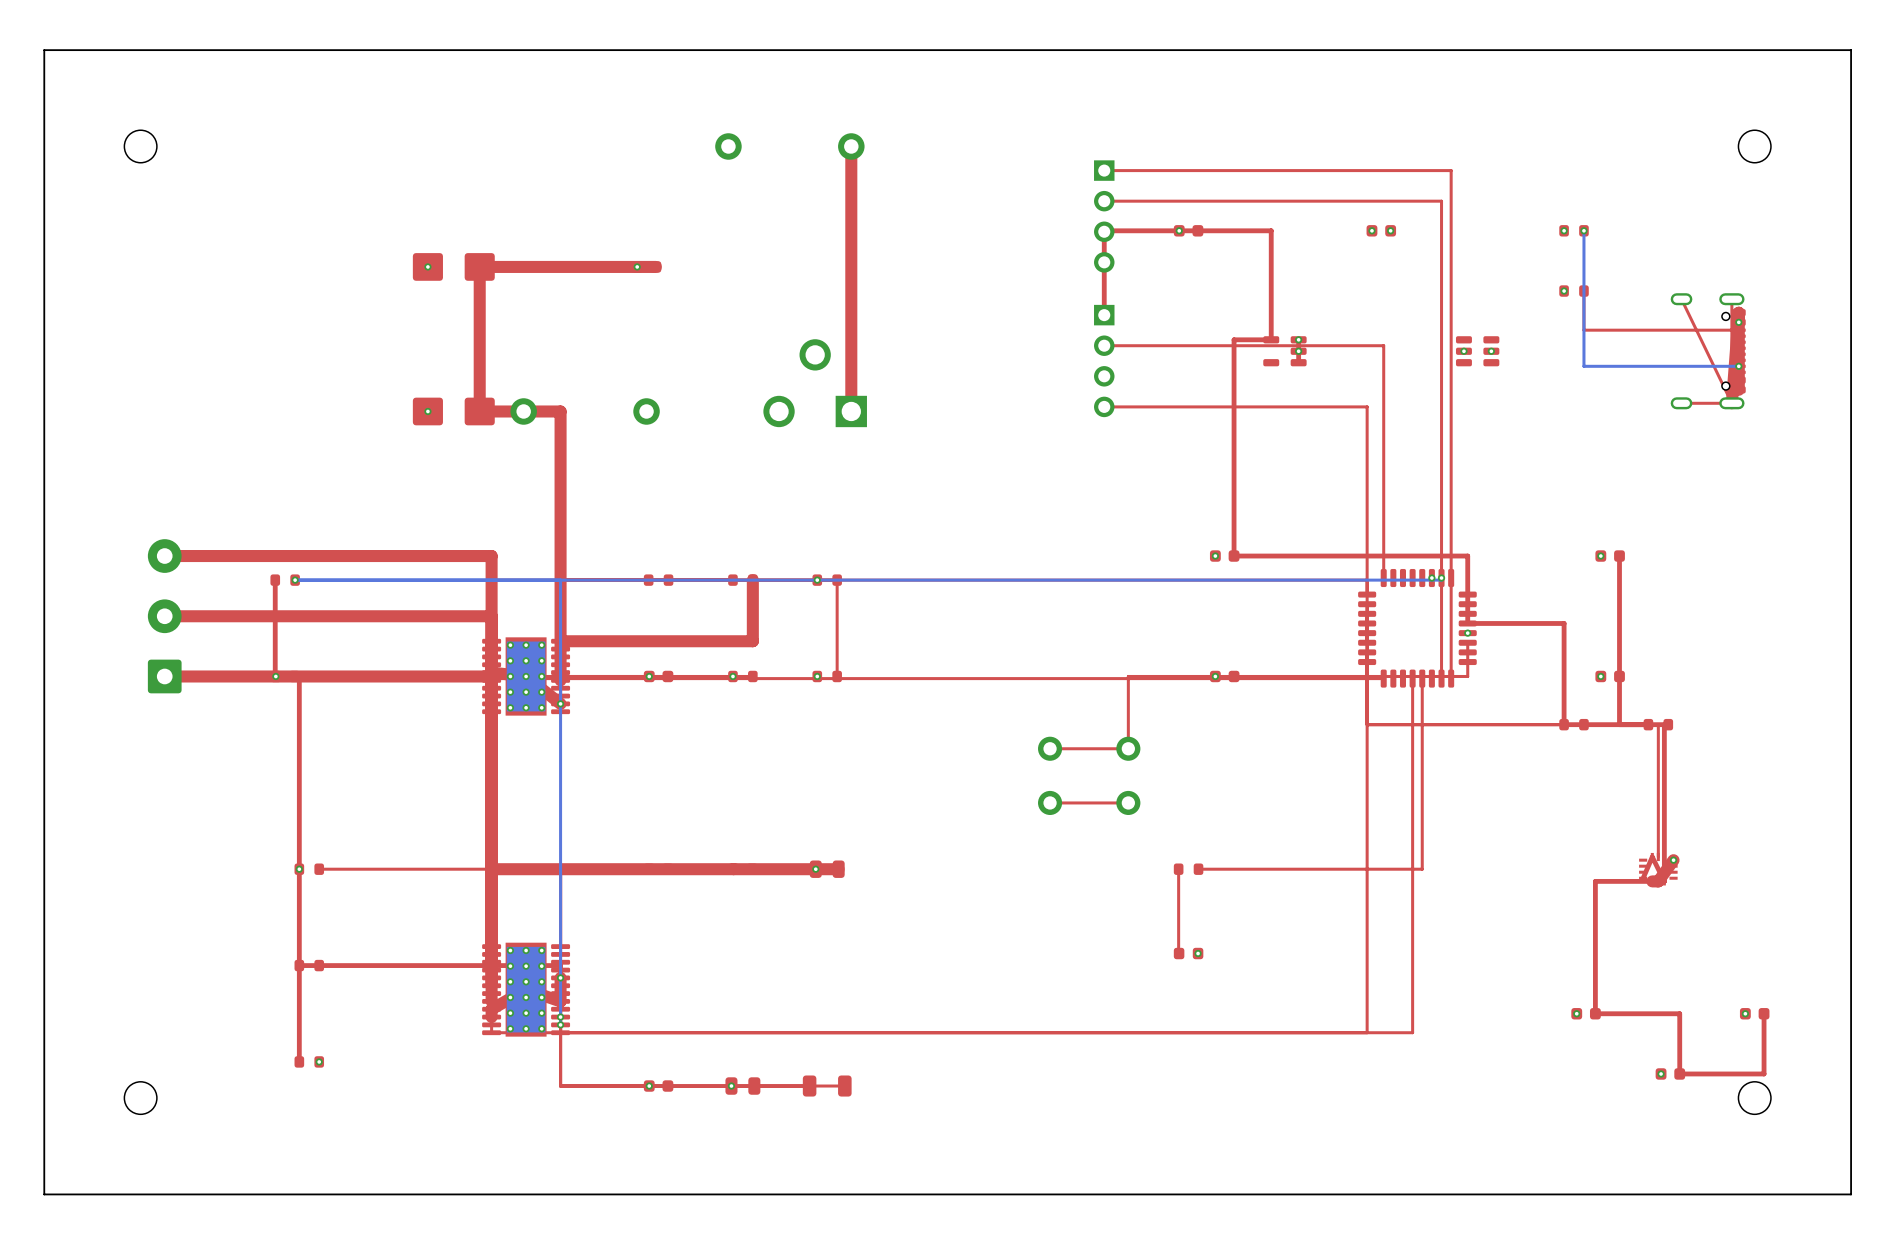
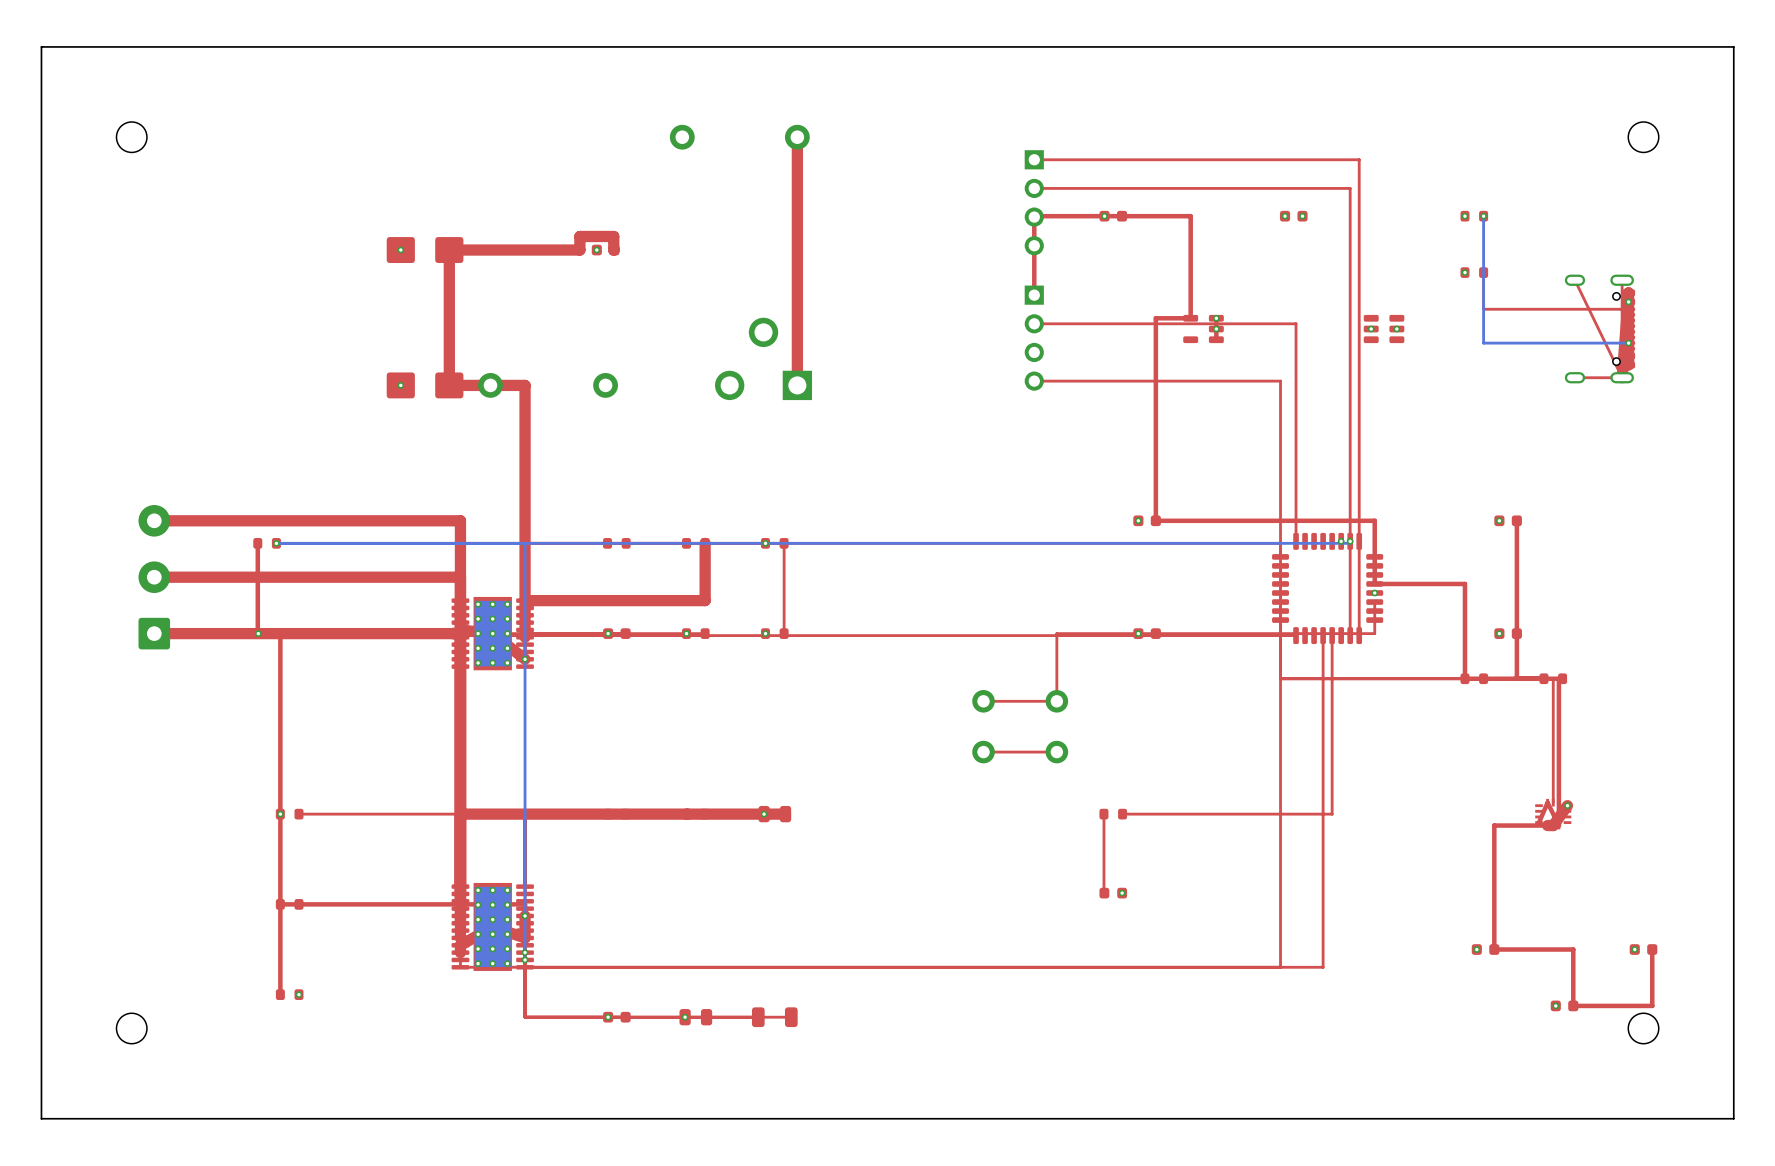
top track: (655, 266) (619, 266) -> (613, 250) (613, 236) (579, 236) (579, 250)

